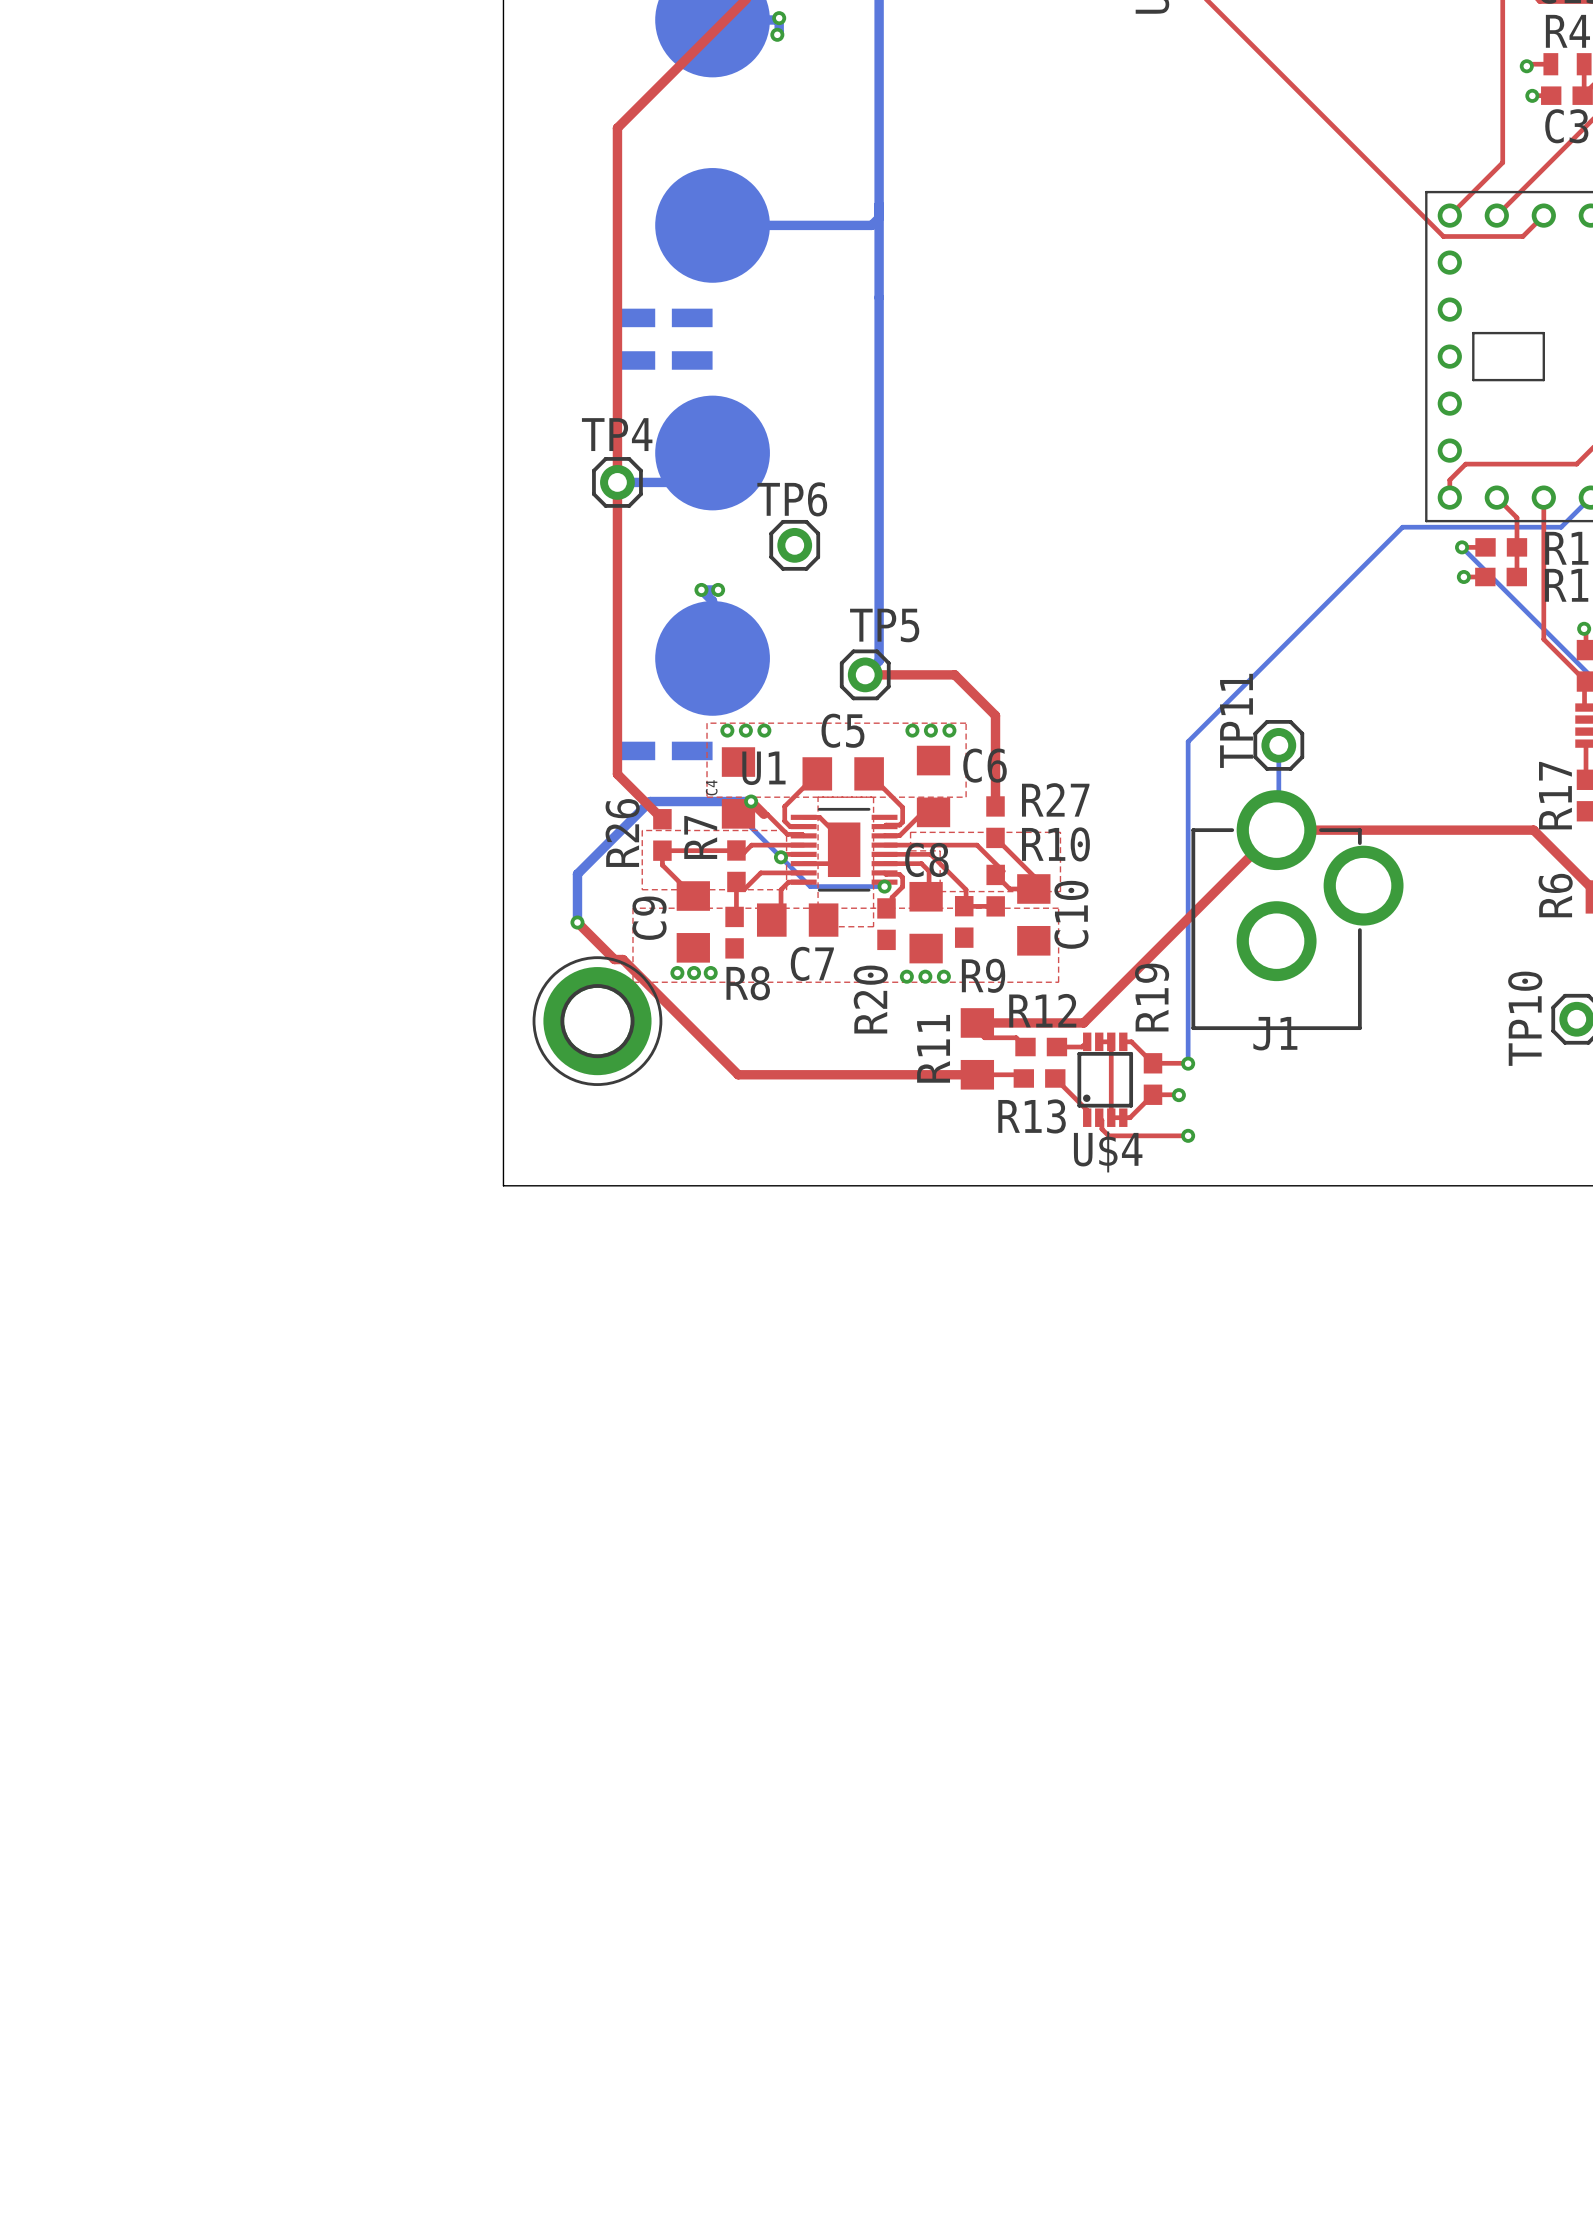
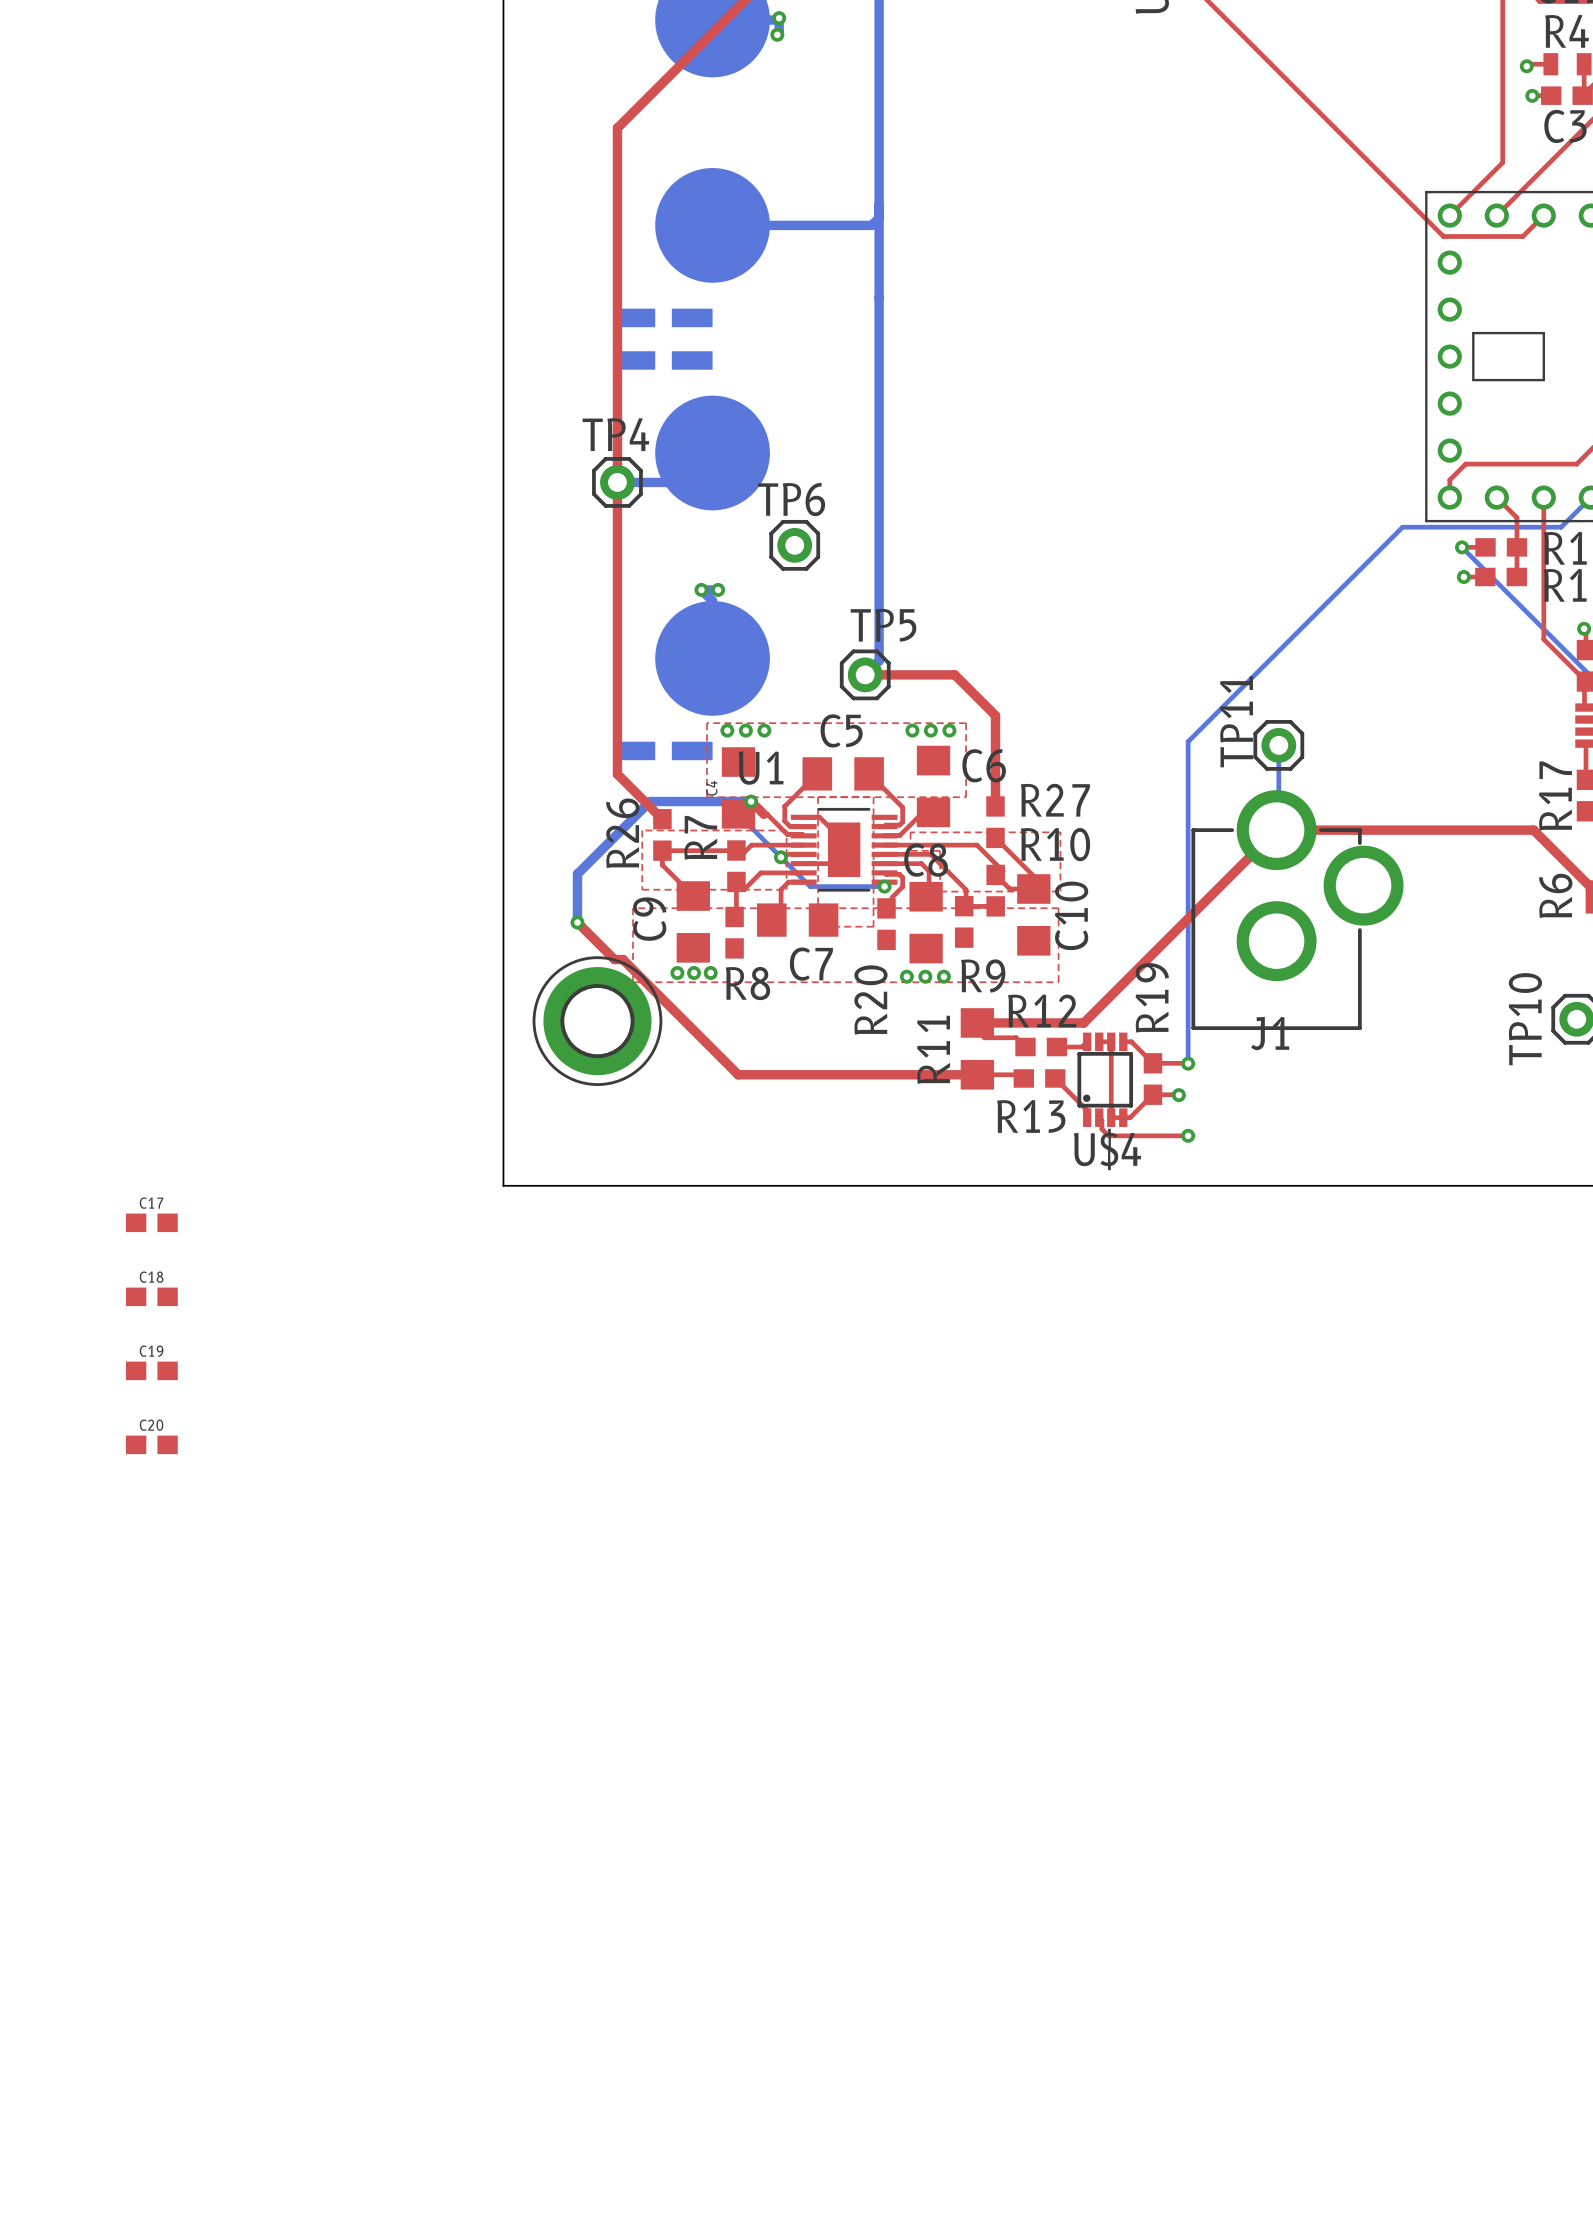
C17: none -> (151, 1222)
C18: none -> (151, 1296)
C19: none -> (151, 1370)
C20: none -> (151, 1444)

